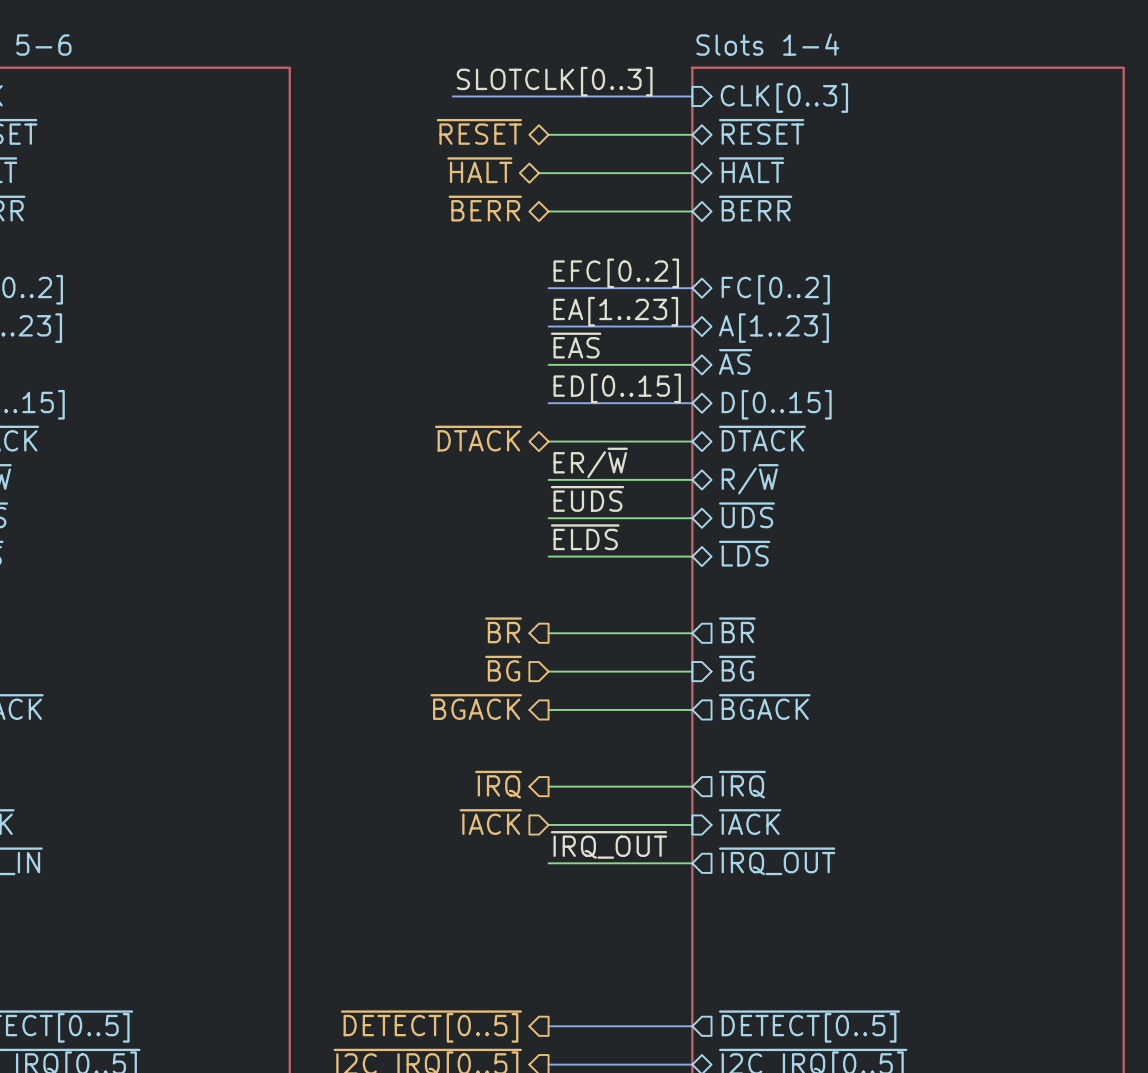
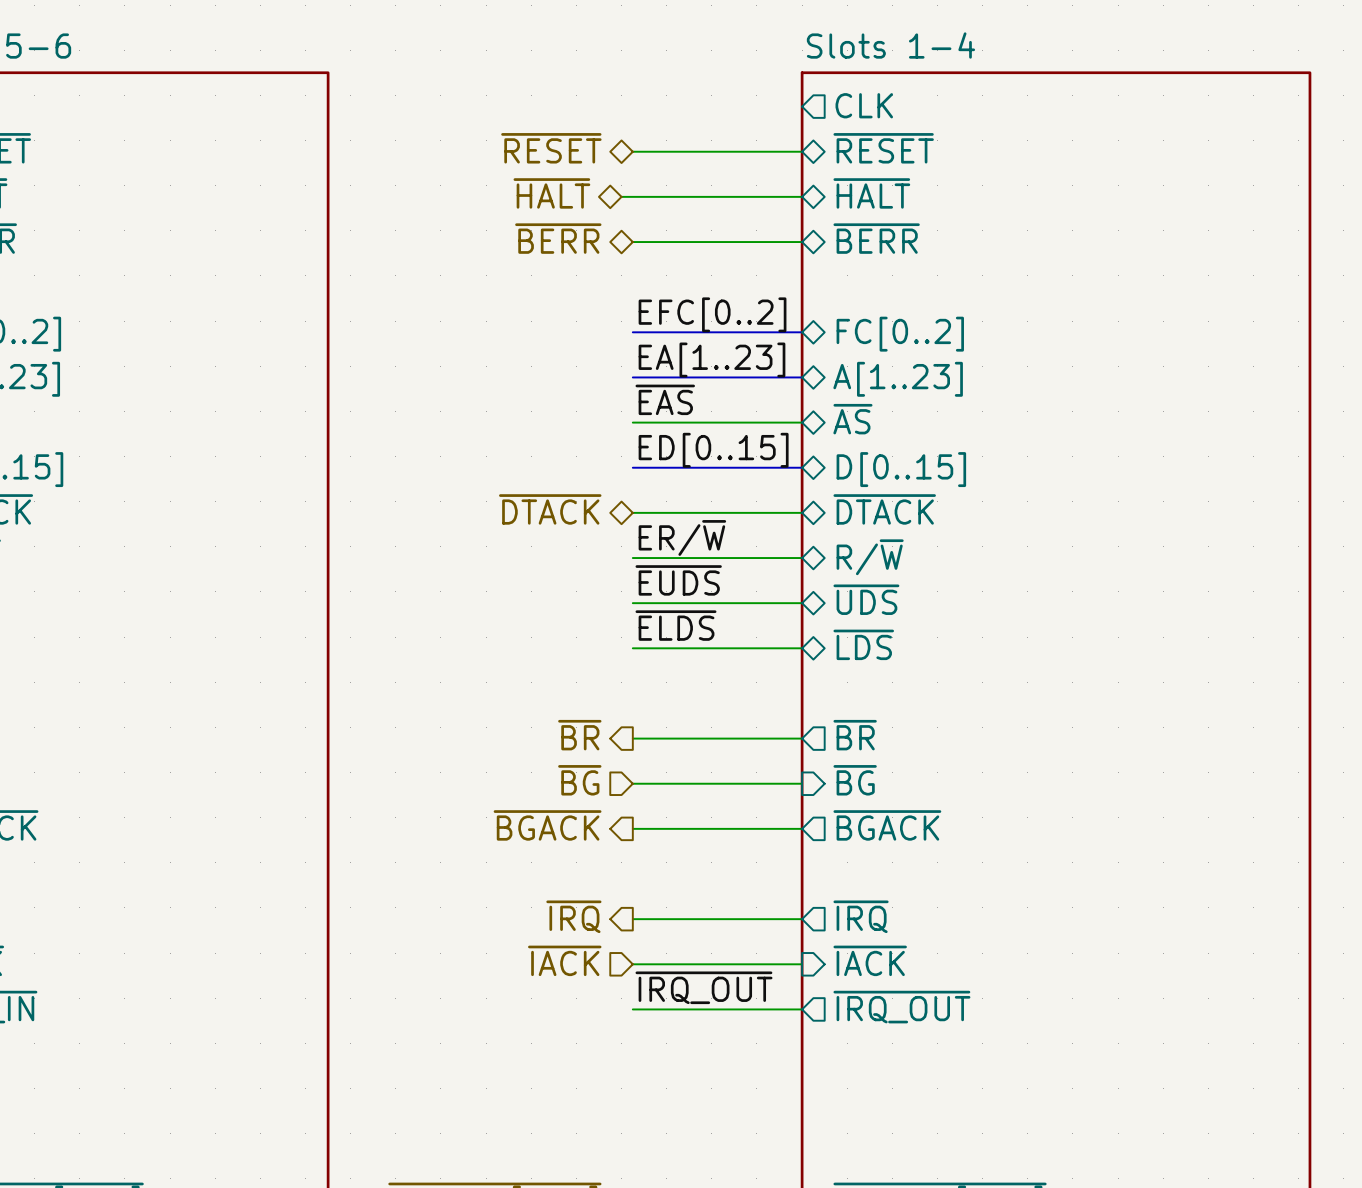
label: SLOTCLK[0..3] (554, 81) -> none
bus: (452, 96) (692, 96) -> none
sheet pin shape: input (784, 98) -> output (864, 105)
sheet pin: CLK[0..3] (784, 98) -> CLK (864, 105)

